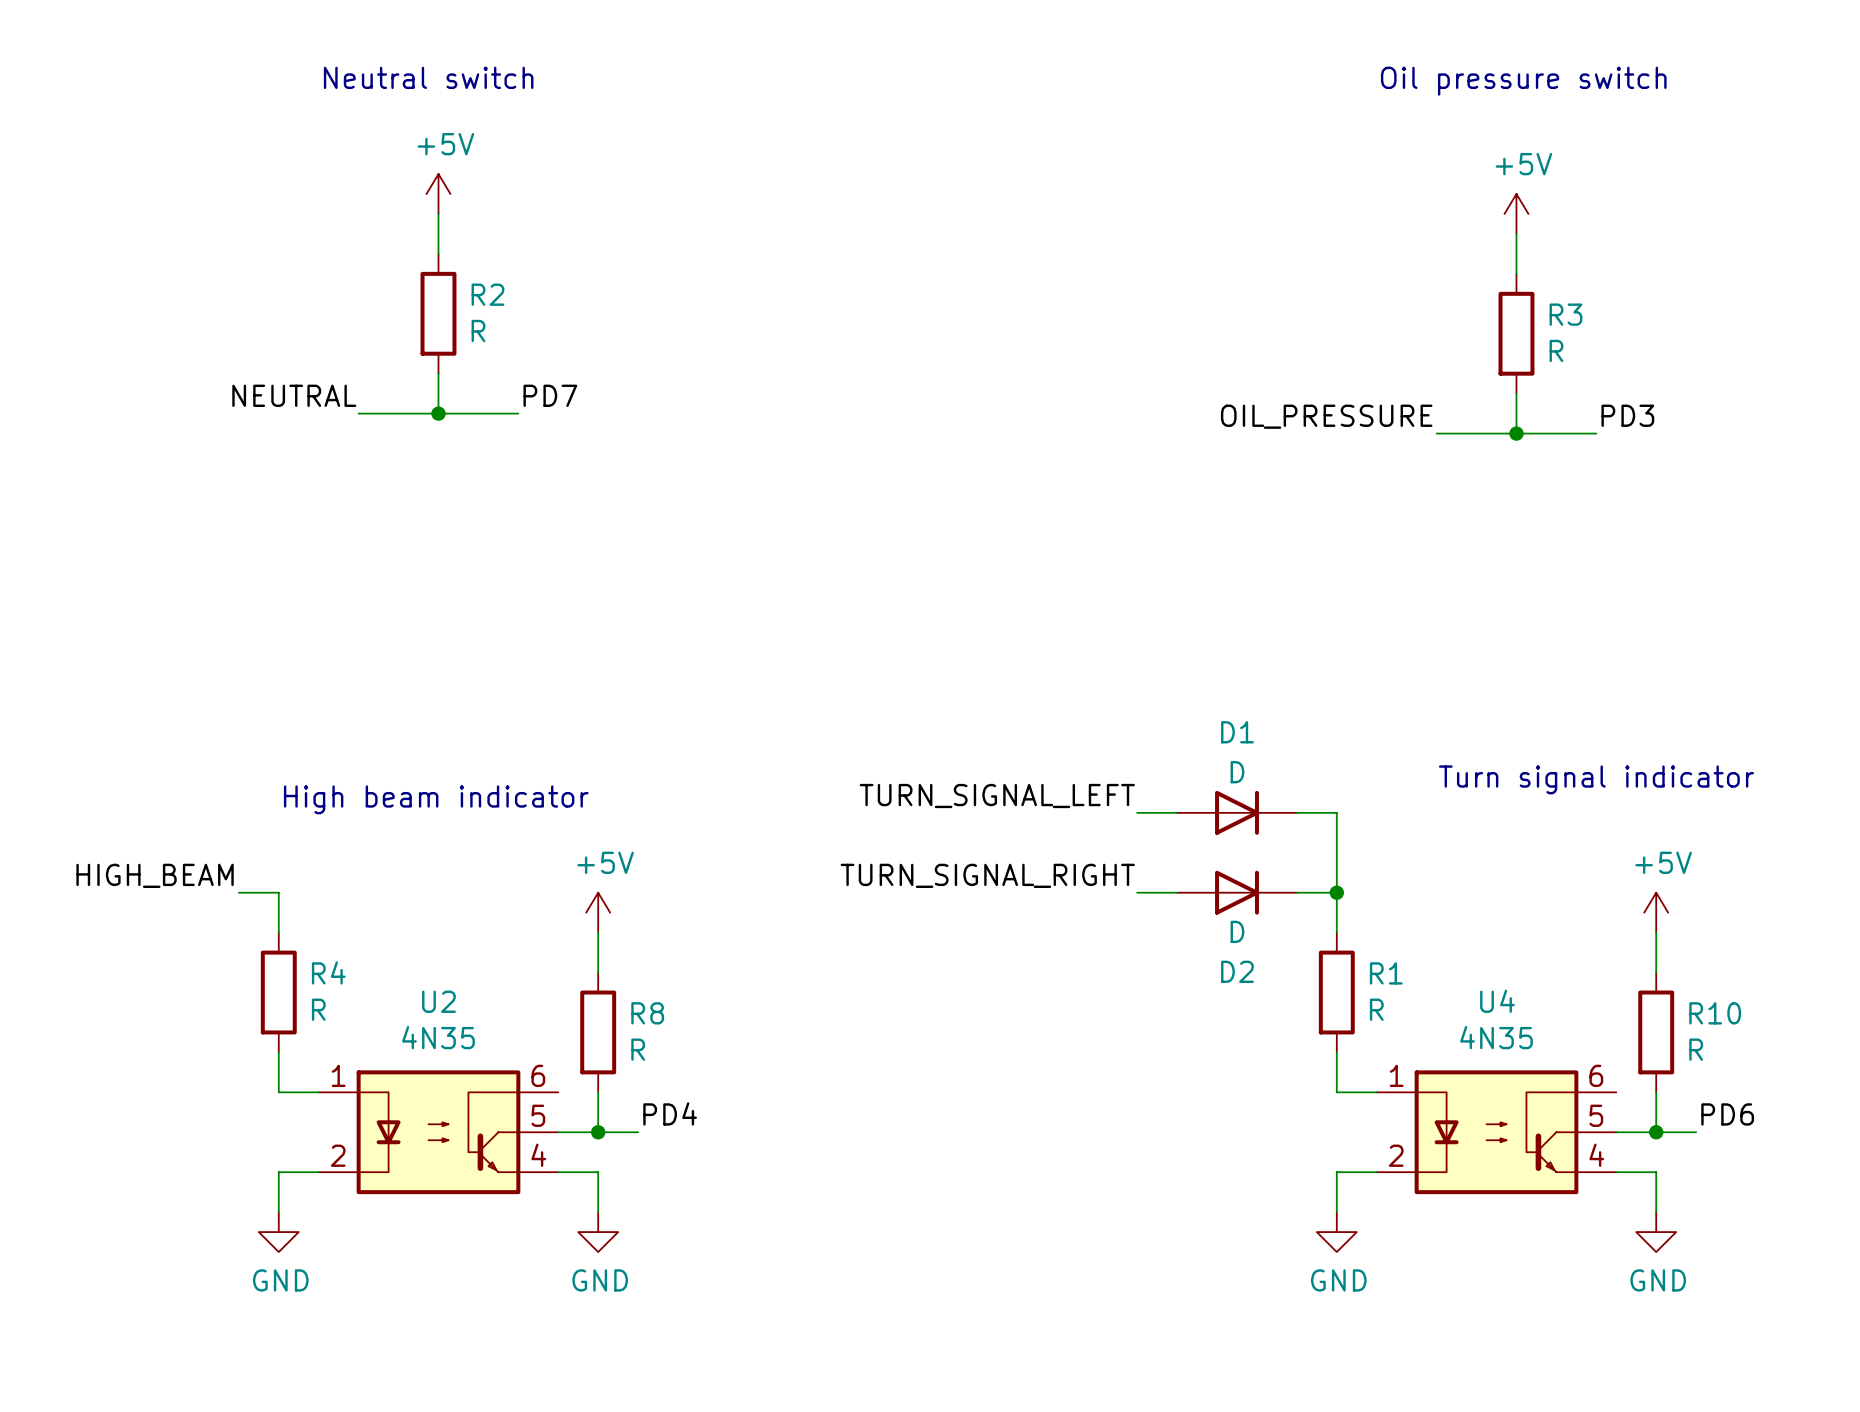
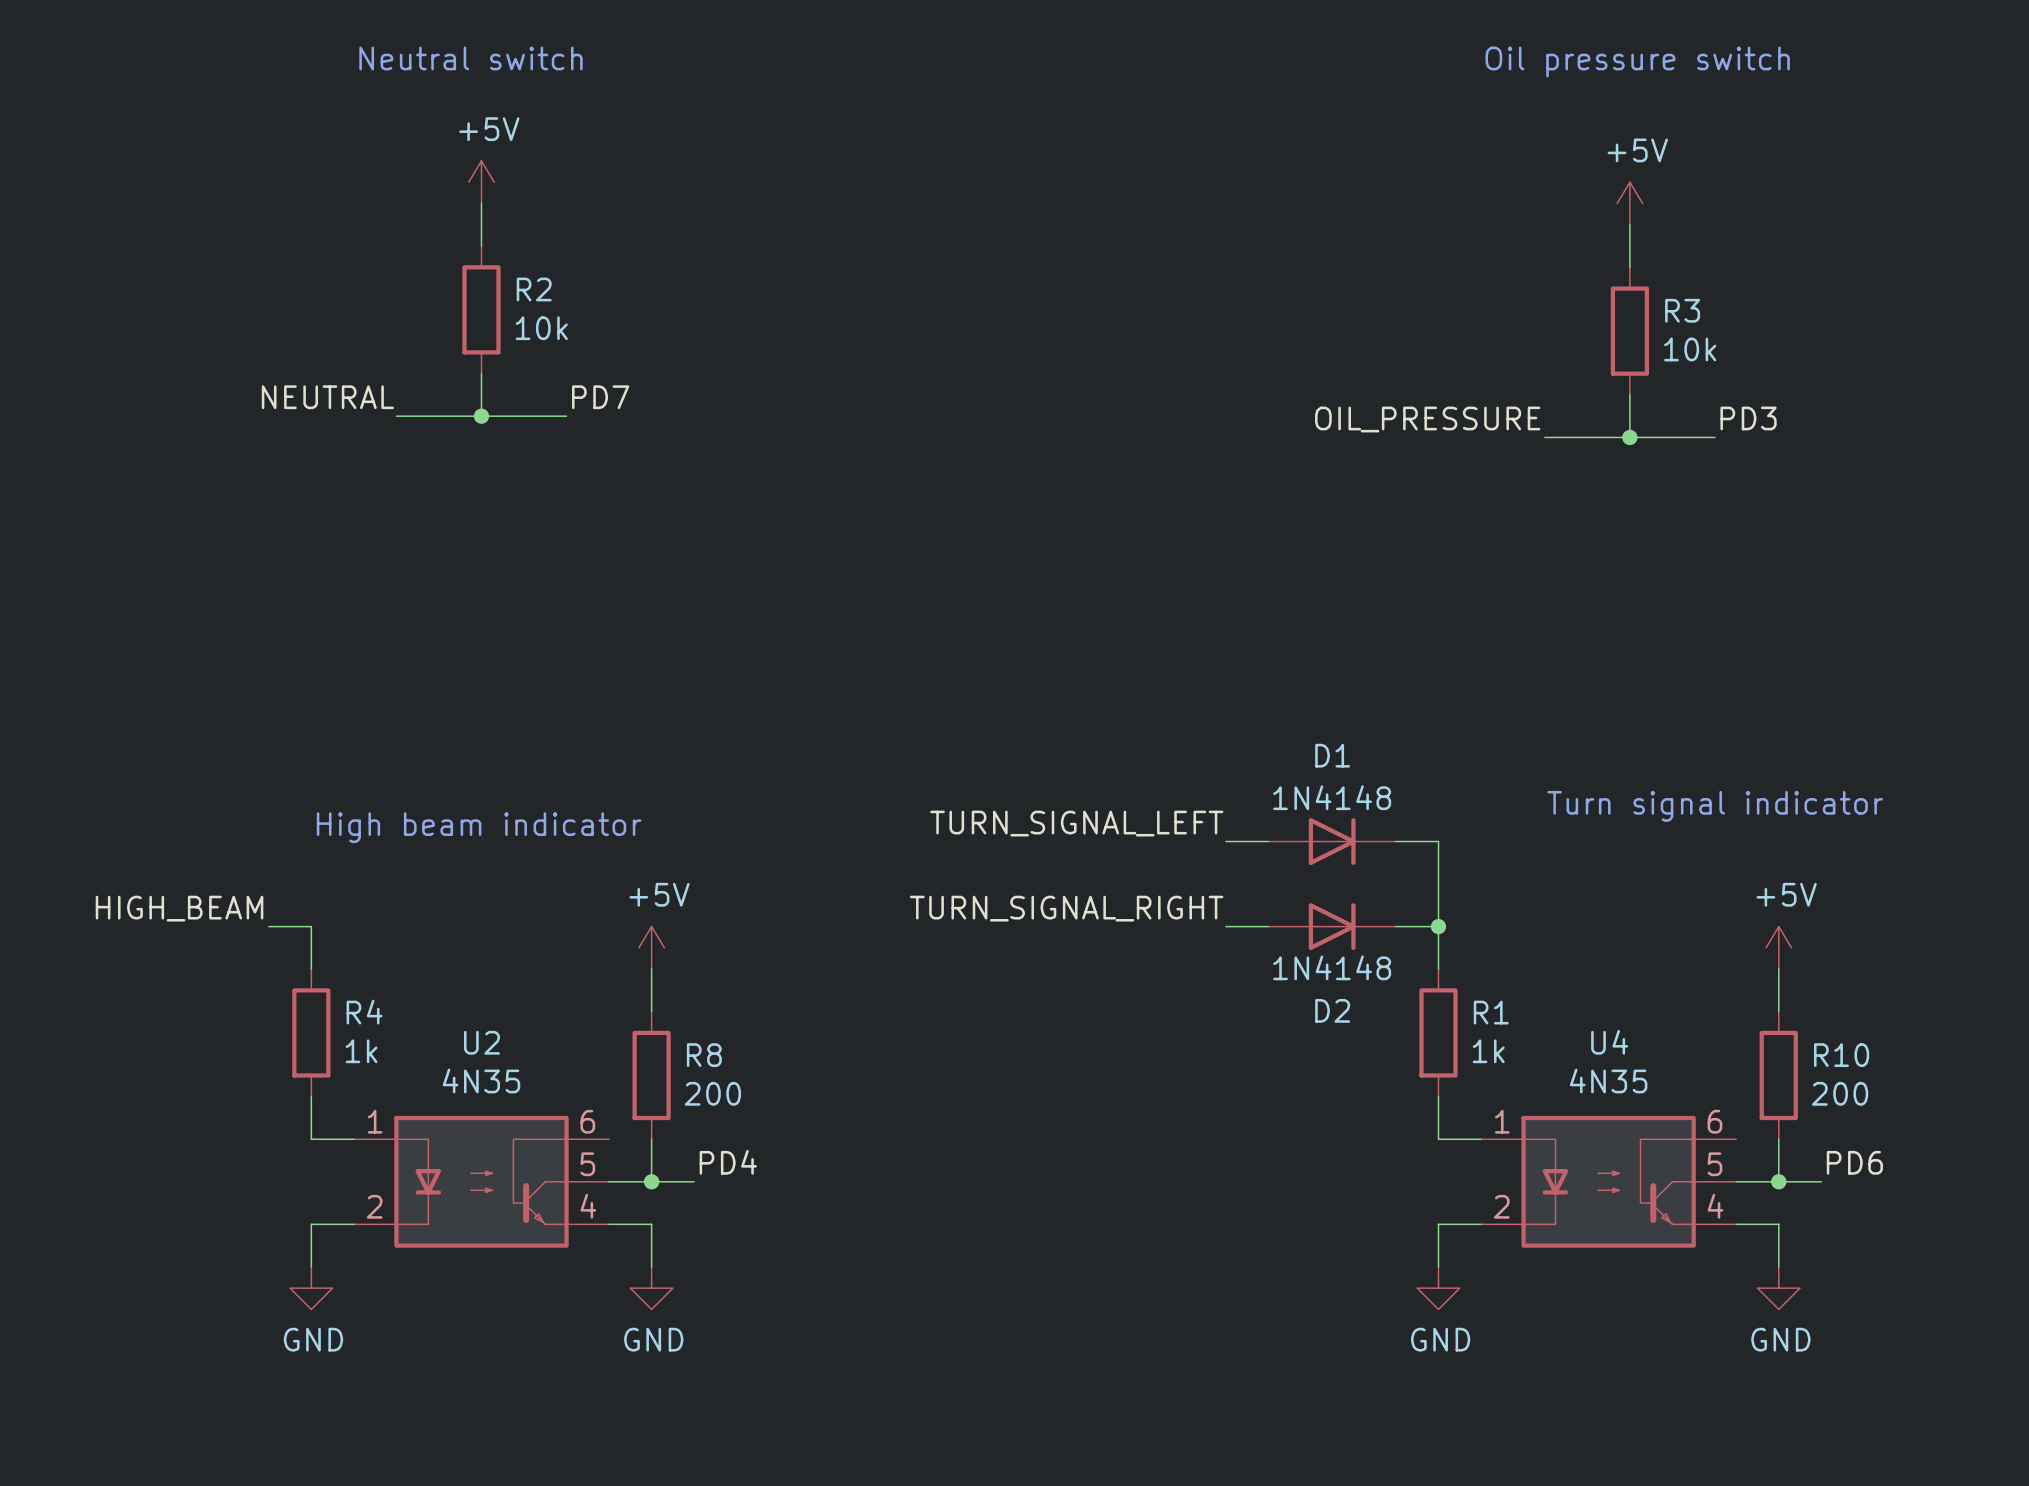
R2 value: R (478, 331) -> 10k (541, 328)
R3 value: R (1556, 350) -> 10k (1690, 349)
D1 value: D (1237, 772) -> 1N4148 (1332, 797)
D2 value: D (1237, 931) -> 1N4148 (1332, 967)
R4 value: R (318, 1009) -> 1k (361, 1051)
R1 value: R (1376, 1009) -> 1k (1488, 1051)
R8 value: R (638, 1049) -> 200 (712, 1093)
R10 value: R (1696, 1049) -> 200 (1840, 1093)

